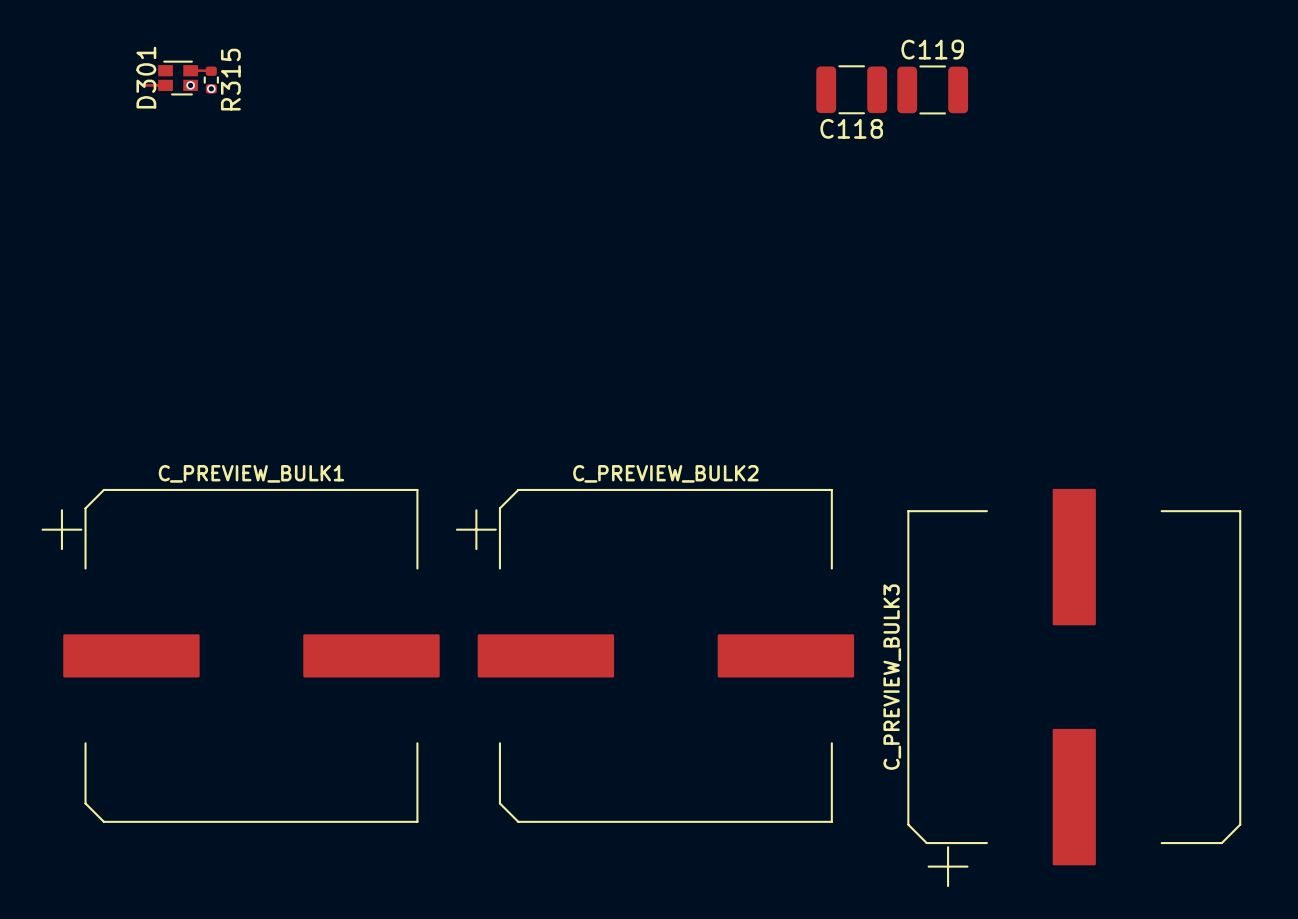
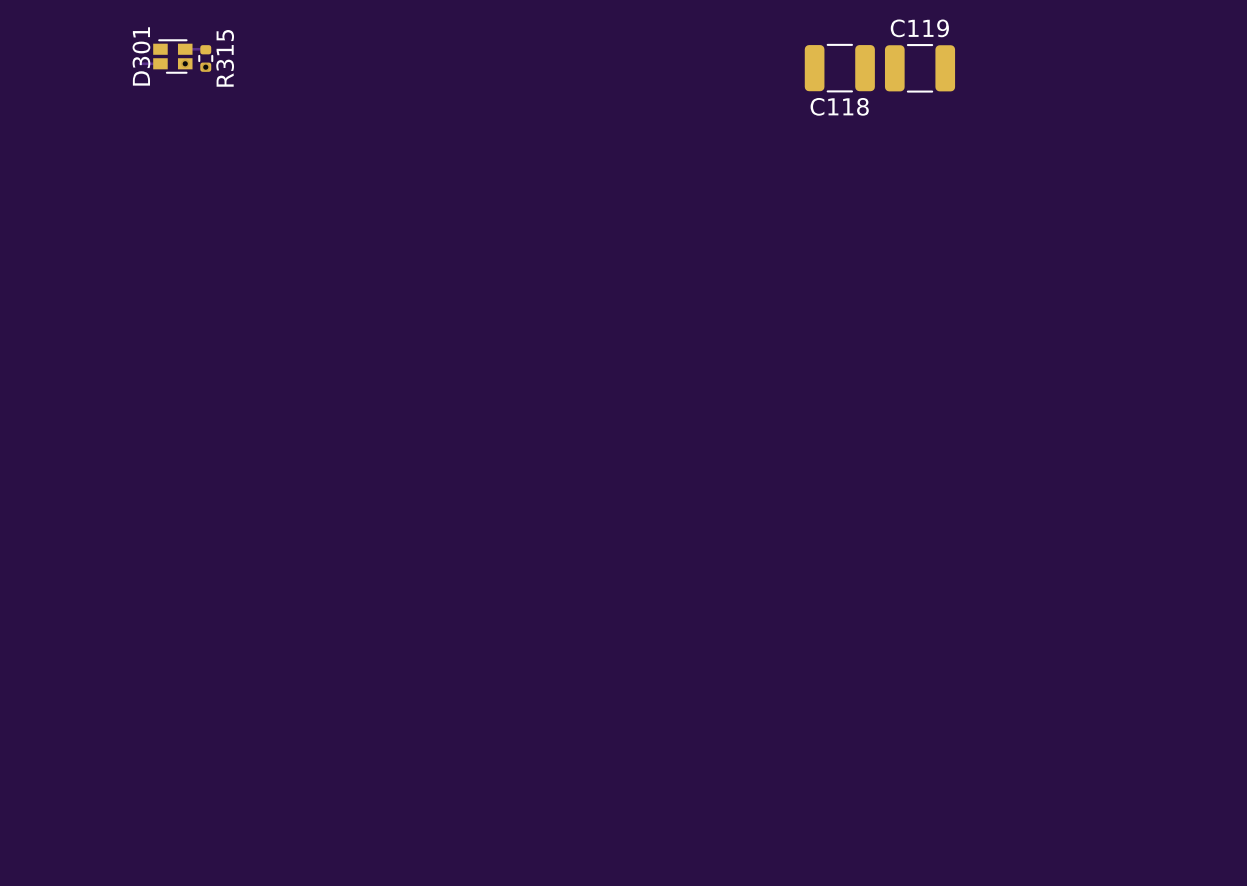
C_PREVIEW_BULK1: (240, 655) -> none
C_PREVIEW_BULK2: (655, 655) -> none
C_PREVIEW_BULK3: (1074, 687) -> none

